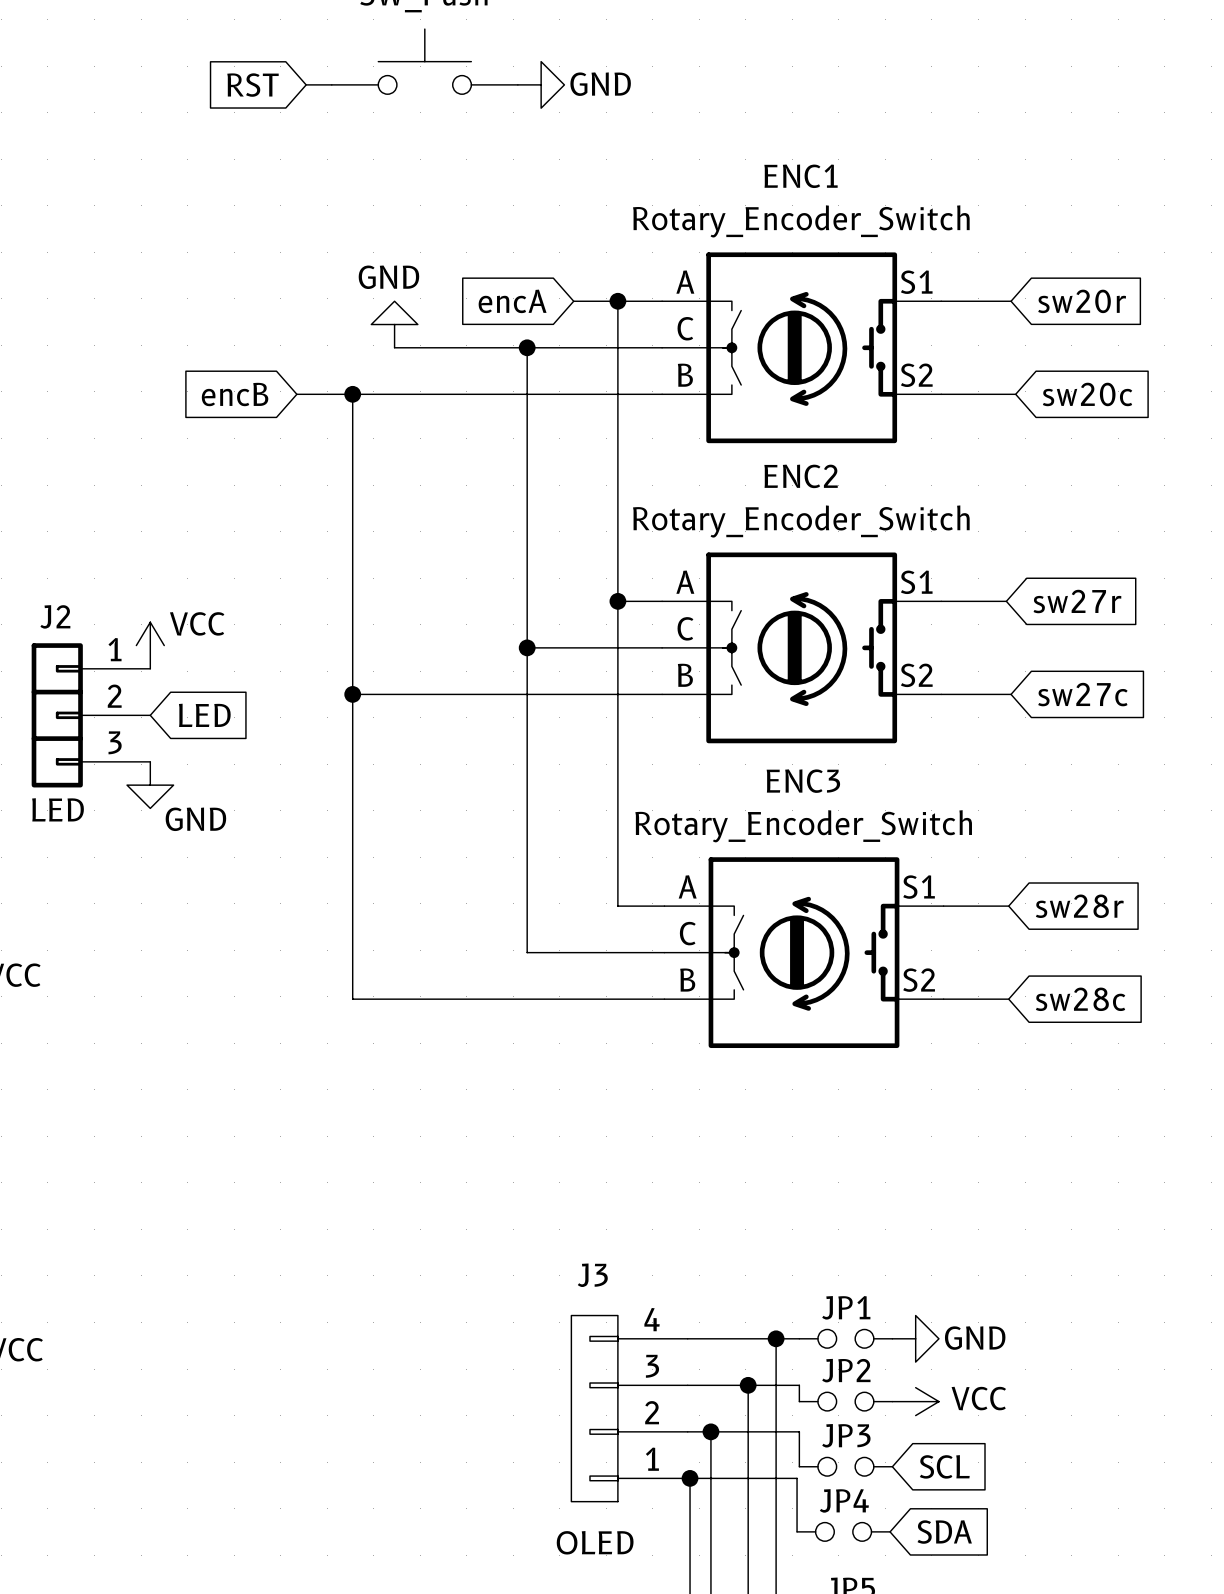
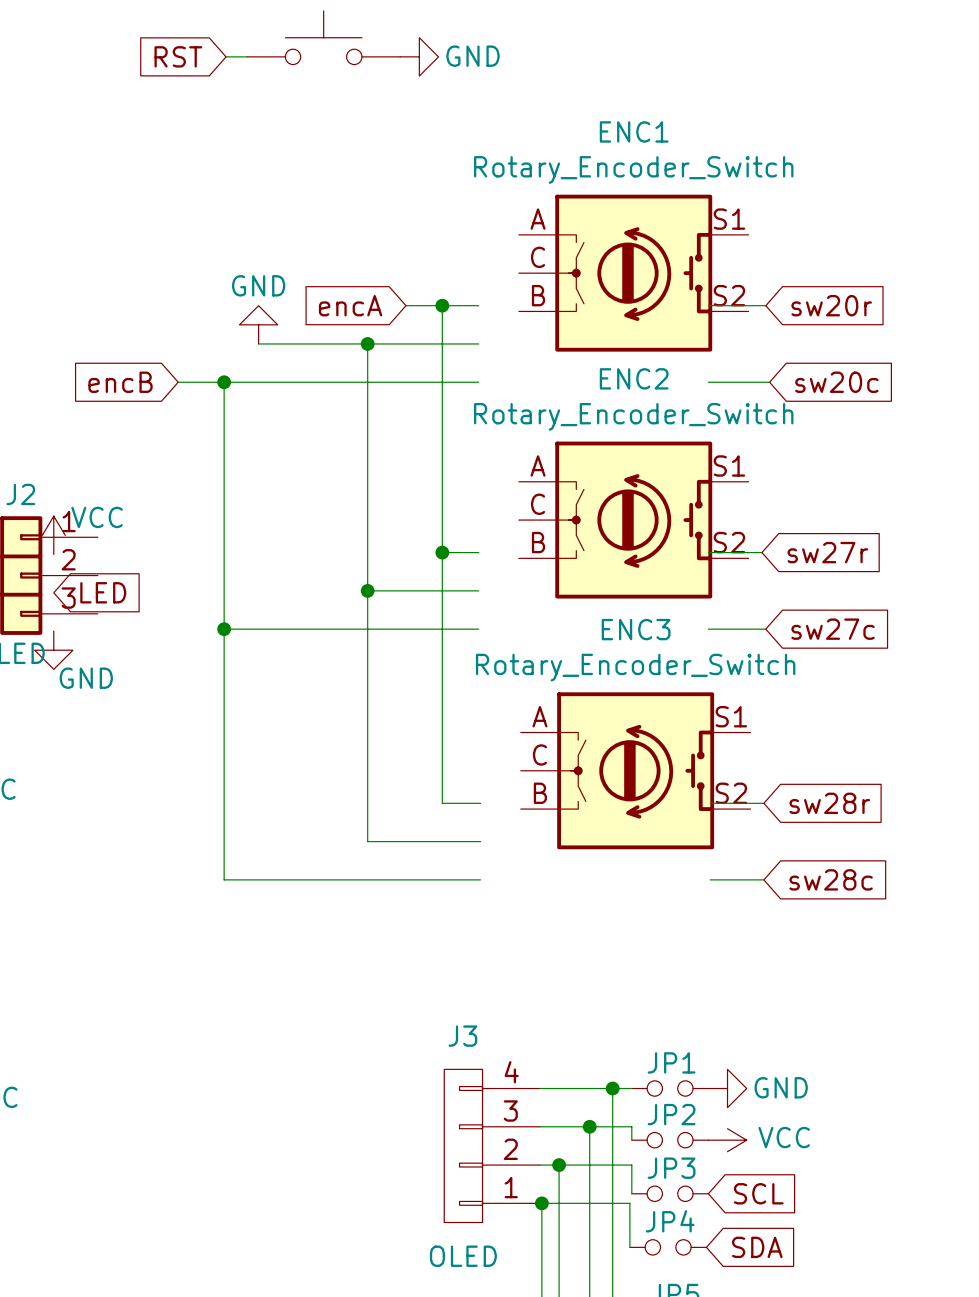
global label position: encA (512, 301) -> encA (350, 305)
wire: (573, 301) (662, 301) -> (405, 305) (478, 305)
wire: (617, 301) (617, 906) (664, 906) -> (442, 305) (442, 803) (480, 803)
junction: (617, 301) -> none
wire: (941, 301) (1011, 301) -> (708, 305) (765, 305)
global label position: sw20r (1082, 301) -> sw20r (831, 305)
power symbol position: GND (394, 324) -> GND (258, 324)
wire: (394, 347) (662, 347) -> (258, 343) (478, 343)
wire: (527, 347) (527, 952) (664, 952) -> (367, 343) (367, 841) (480, 841)
junction: (527, 347) -> none
junction: none -> (442, 305)
global label position: encB (235, 394) -> encB (120, 382)
wire: (296, 394) (662, 394) -> (178, 382) (478, 382)
wire: (352, 394) (352, 999) (664, 999) -> (224, 382) (224, 879) (480, 879)
junction: (352, 394) -> none
wire: (941, 394) (1015, 394) -> (708, 382) (769, 382)
global label position: sw20c (1087, 394) -> sw20c (836, 382)
junction: none -> (367, 343)
junction: none -> (224, 382)
wire: (617, 601) (662, 601) -> (442, 552) (478, 552)
junction: (617, 601) -> none
wire: (941, 601) (1006, 601) -> (708, 552) (761, 552)
global label position: sw27r (1077, 601) -> sw27r (827, 552)
power symbol position: VCC (150, 645) -> VCC (53, 535)
wire: (527, 647) (662, 647) -> (367, 590) (478, 590)
junction: (527, 647) -> none
junction: none -> (442, 552)
wire: (352, 694) (662, 694) -> (224, 629) (478, 629)
junction: (352, 694) -> none
wire: (941, 694) (1011, 694) -> (708, 629) (765, 629)
global label position: sw27c (1082, 694) -> sw27c (833, 629)
global label position: LED (204, 715) -> LED (103, 592)
junction: none -> (367, 590)
junction: none -> (224, 629)
power symbol position: GND (150, 785) -> GND (53, 650)
wire: (943, 906) (1008, 906) -> (710, 803) (763, 803)
global label position: sw28r (1079, 906) -> sw28r (829, 803)
wire: (943, 999) (1008, 999) -> (710, 879) (763, 879)
global label position: sw28c (1080, 999) -> sw28c (831, 879)

